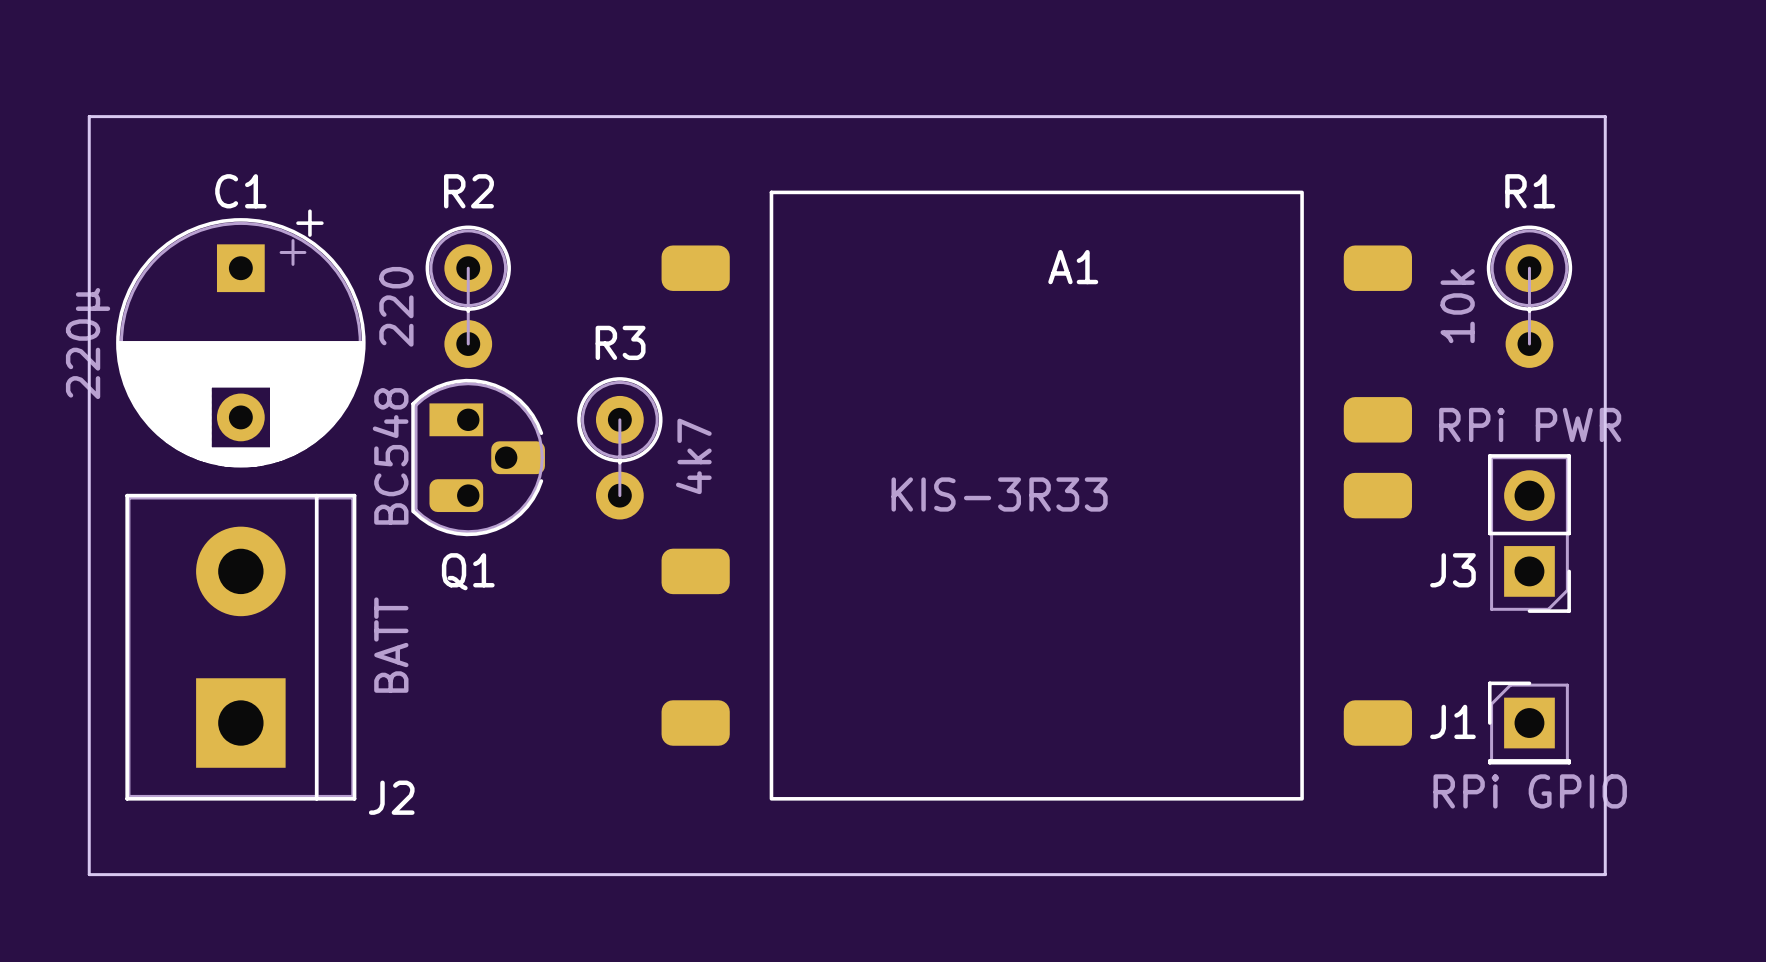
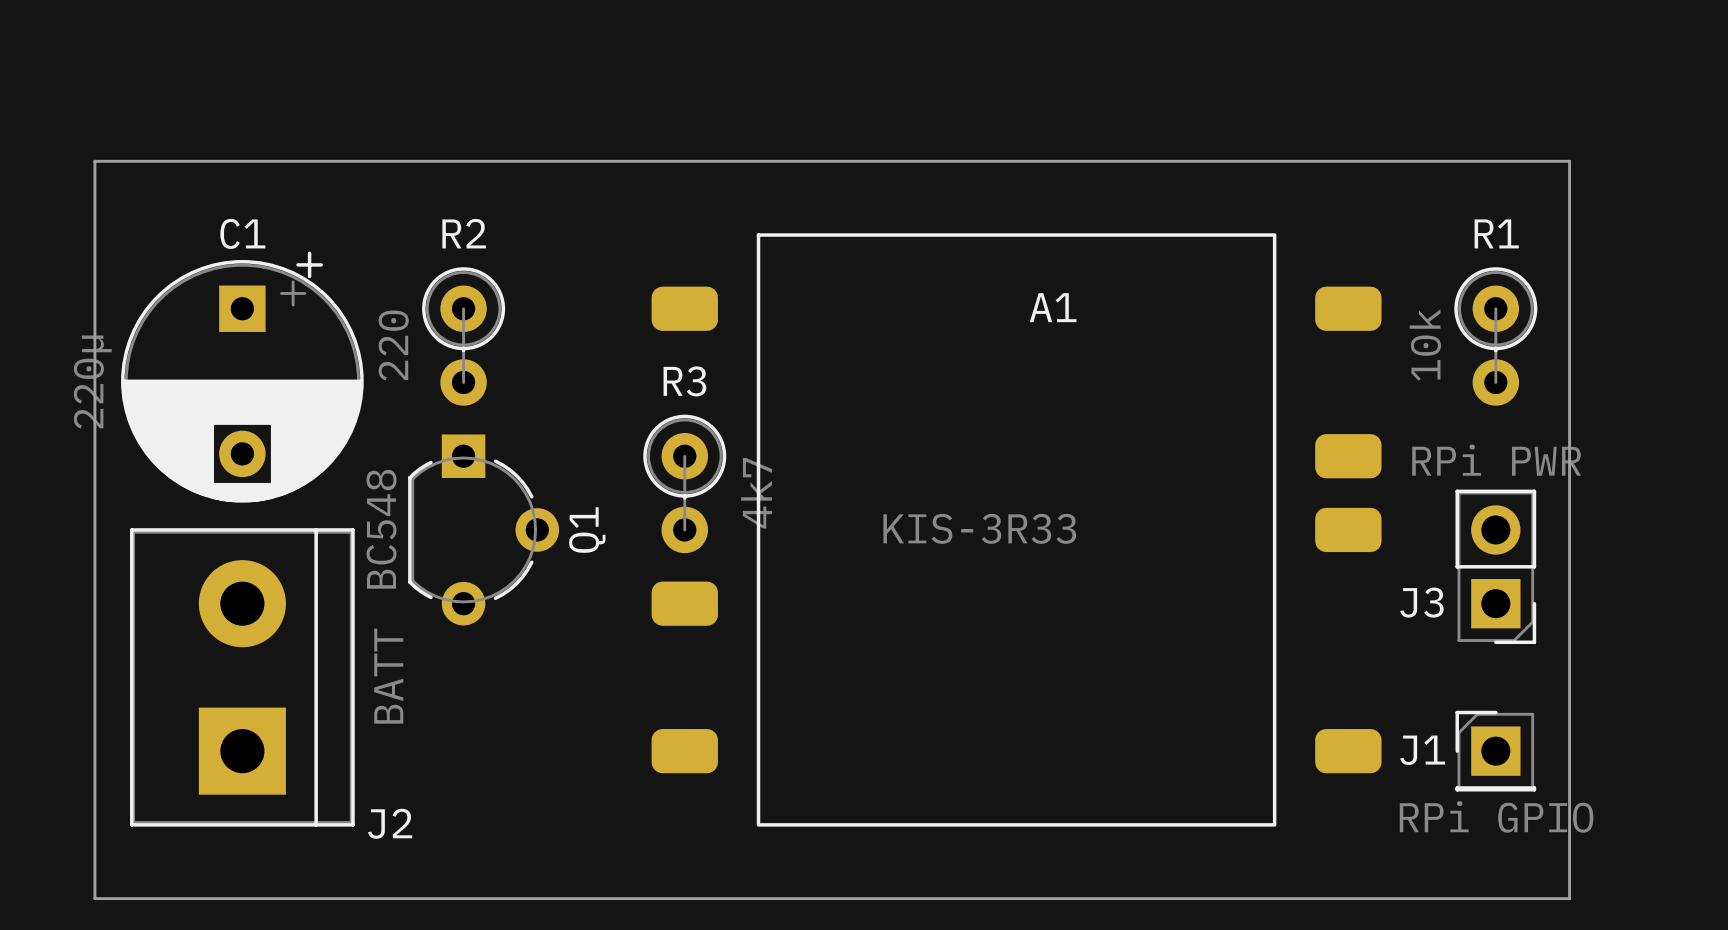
Q1 footprint: [411, 378, 545, 537] -> [408, 434, 560, 626]
R3 position: (619, 448) -> (684, 483)
Q1 name position: Q1 (468, 571) -> Q1 (587, 530)

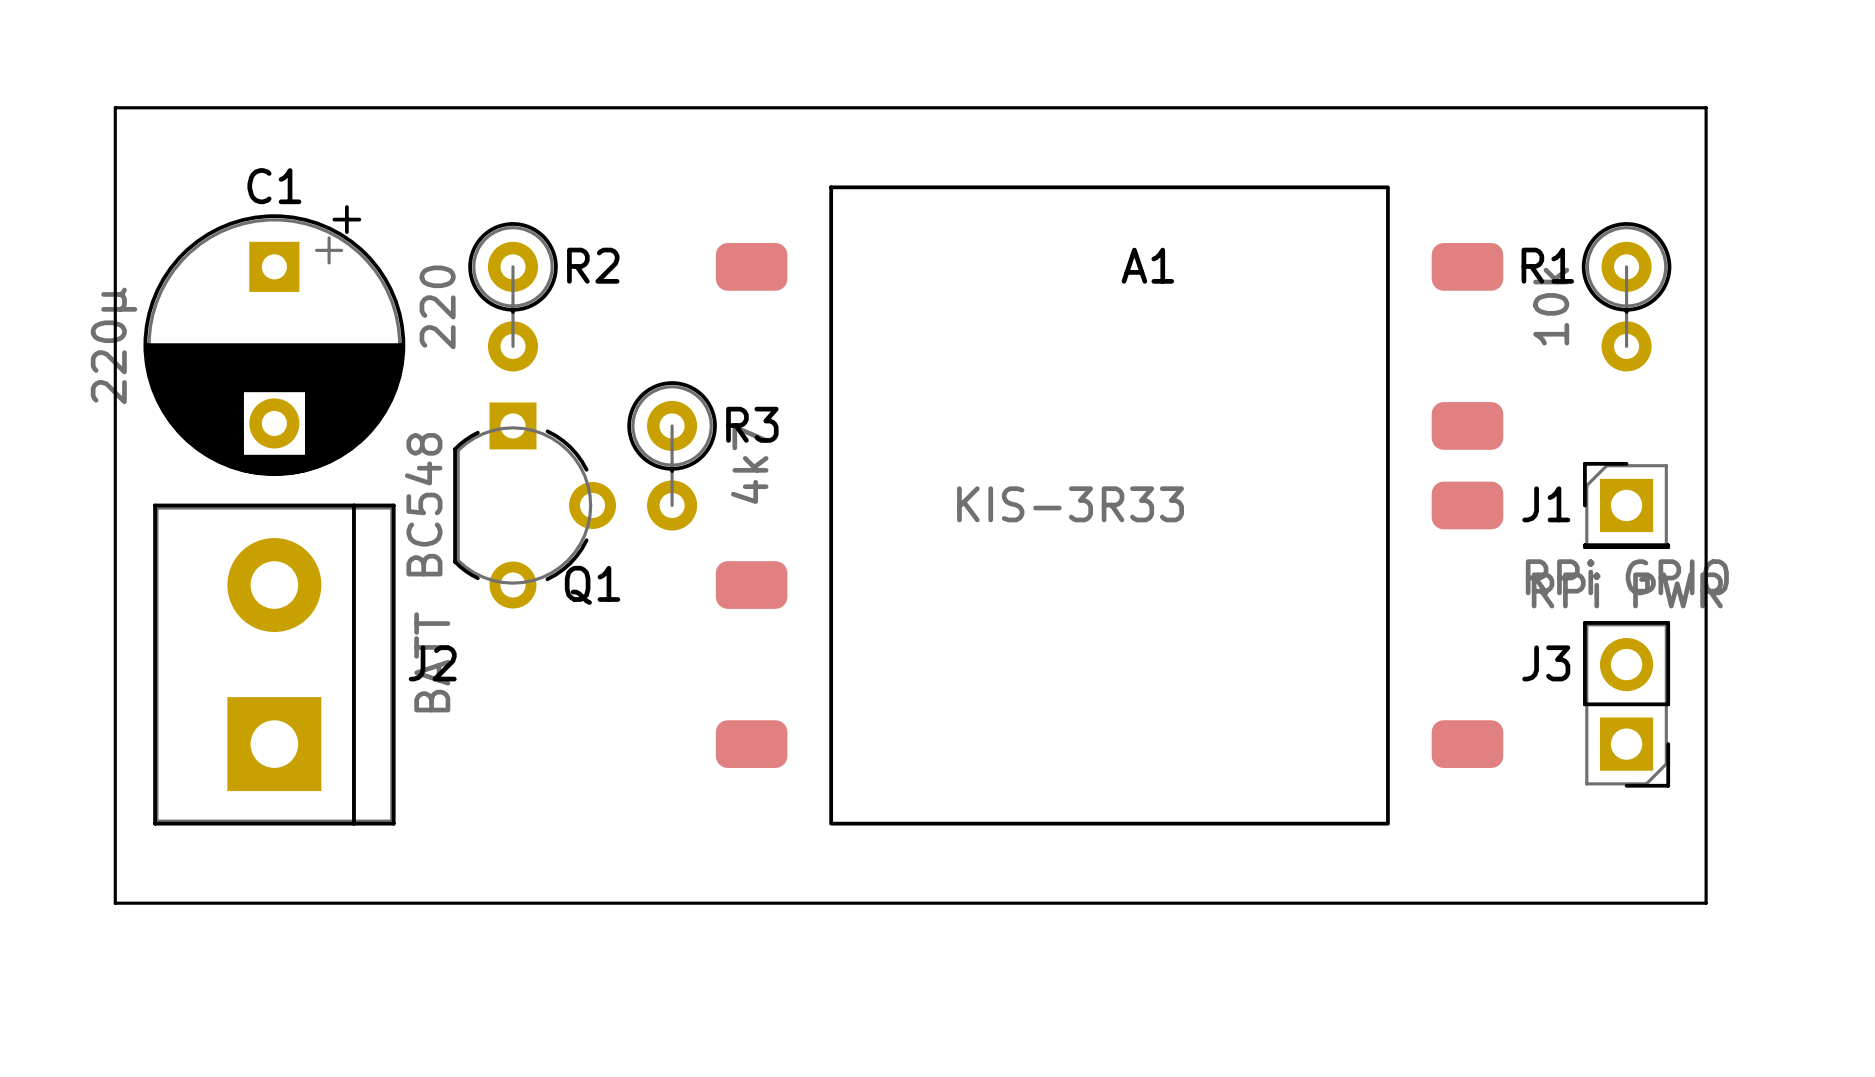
R2 name position: R2 (464, 233) -> R2 (593, 265)
R1 name position: R1 (1496, 233) -> R1 (1547, 265)
R3 name position: R3 (684, 381) -> R3 (752, 424)
R3 position: (684, 483) -> (672, 455)
Q1 name rotation: 0° (587, 530) -> 90° clockwise (592, 585)
Q1 name position: Q1 (587, 530) -> Q1 (592, 585)
J3 position: (1495, 566) -> (1626, 704)
J3 name position: J3 (1421, 602) -> J3 (1546, 663)
J1 position: (1495, 751) -> (1626, 505)
J2 name position: J2 (390, 823) -> J2 (432, 663)

